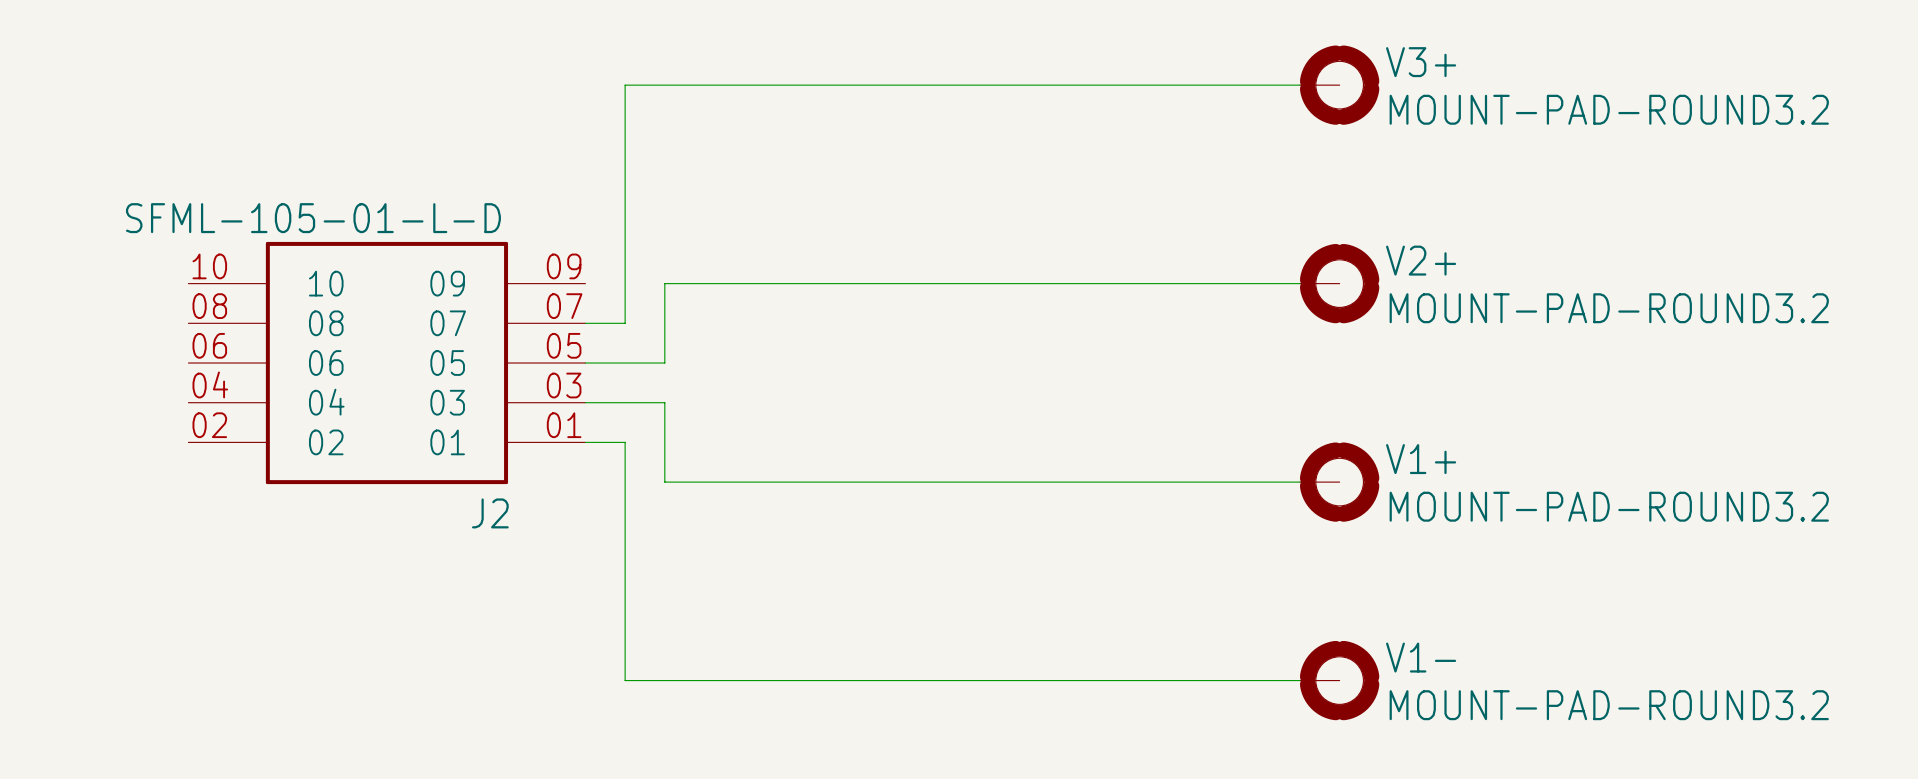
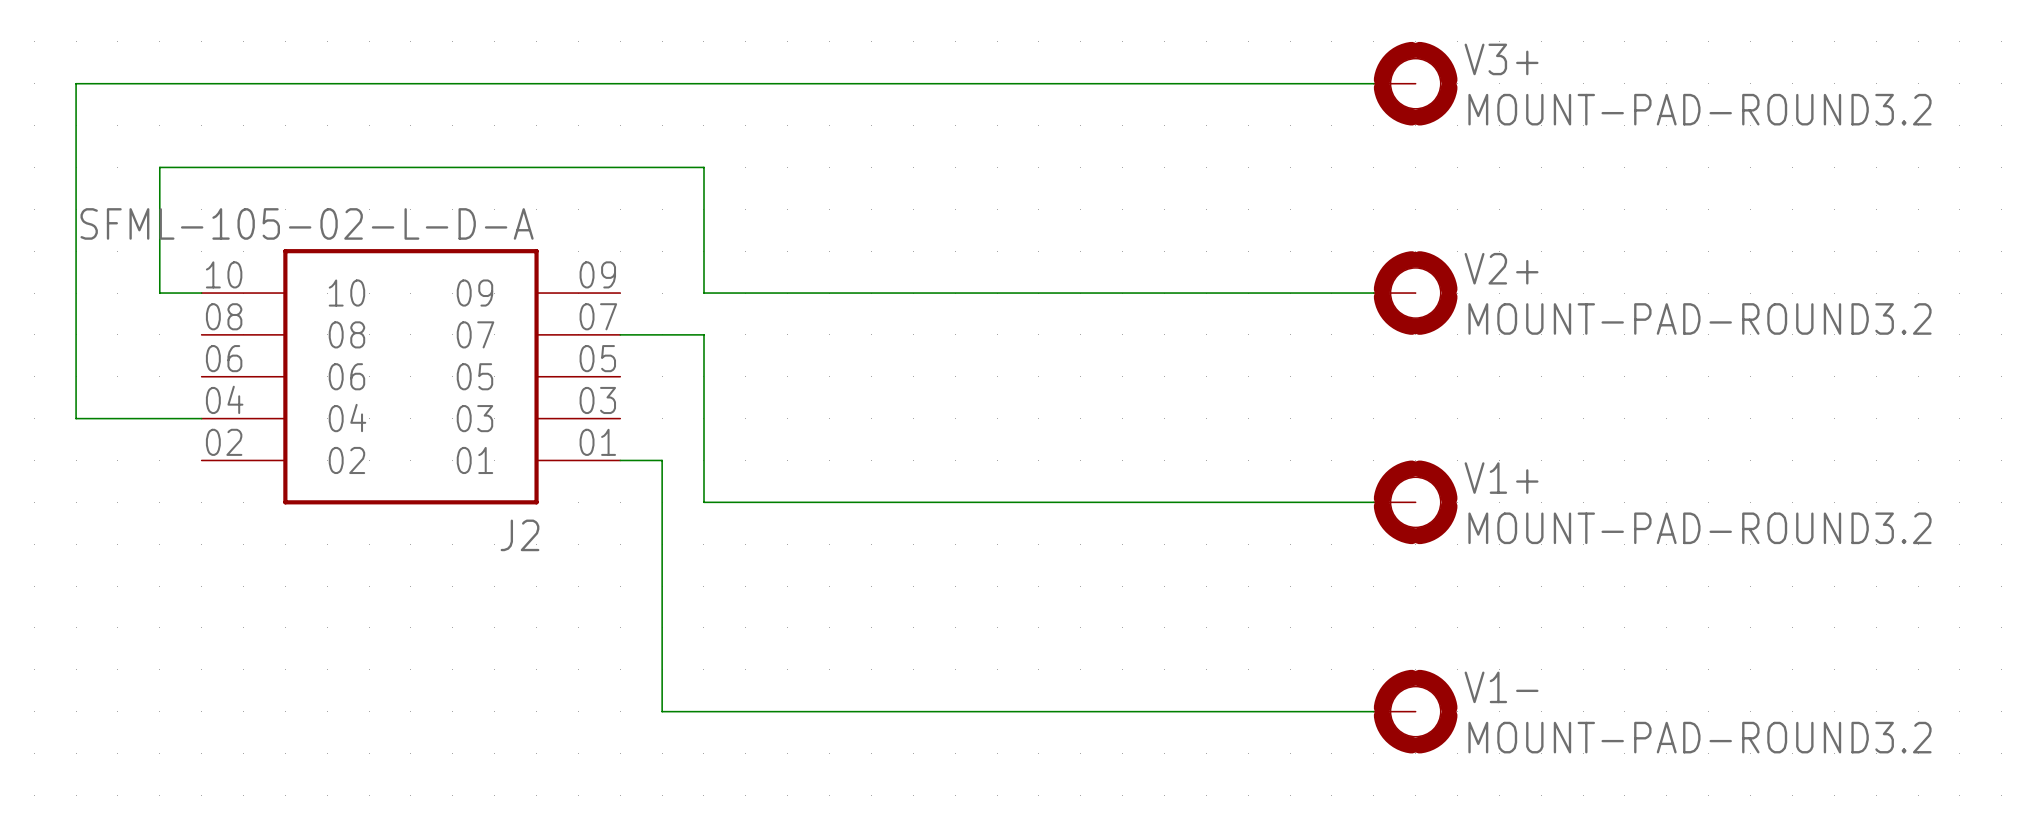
wire: (625, 85) (625, 323) -> (662, 83) (76, 83) (76, 418) (201, 418)
J2 value: SFML-105-01-L-D (313, 218) -> SFML-105-02-L-D-A (307, 223)
wire: none -> (201, 293) (159, 293) (159, 167) (703, 167) (703, 293)
wire: (664, 283) (664, 323) -> (662, 334) (703, 334)
wire: (585, 363) (664, 363) -> (703, 418) (703, 376)
wire: (585, 402) (664, 402) -> none

